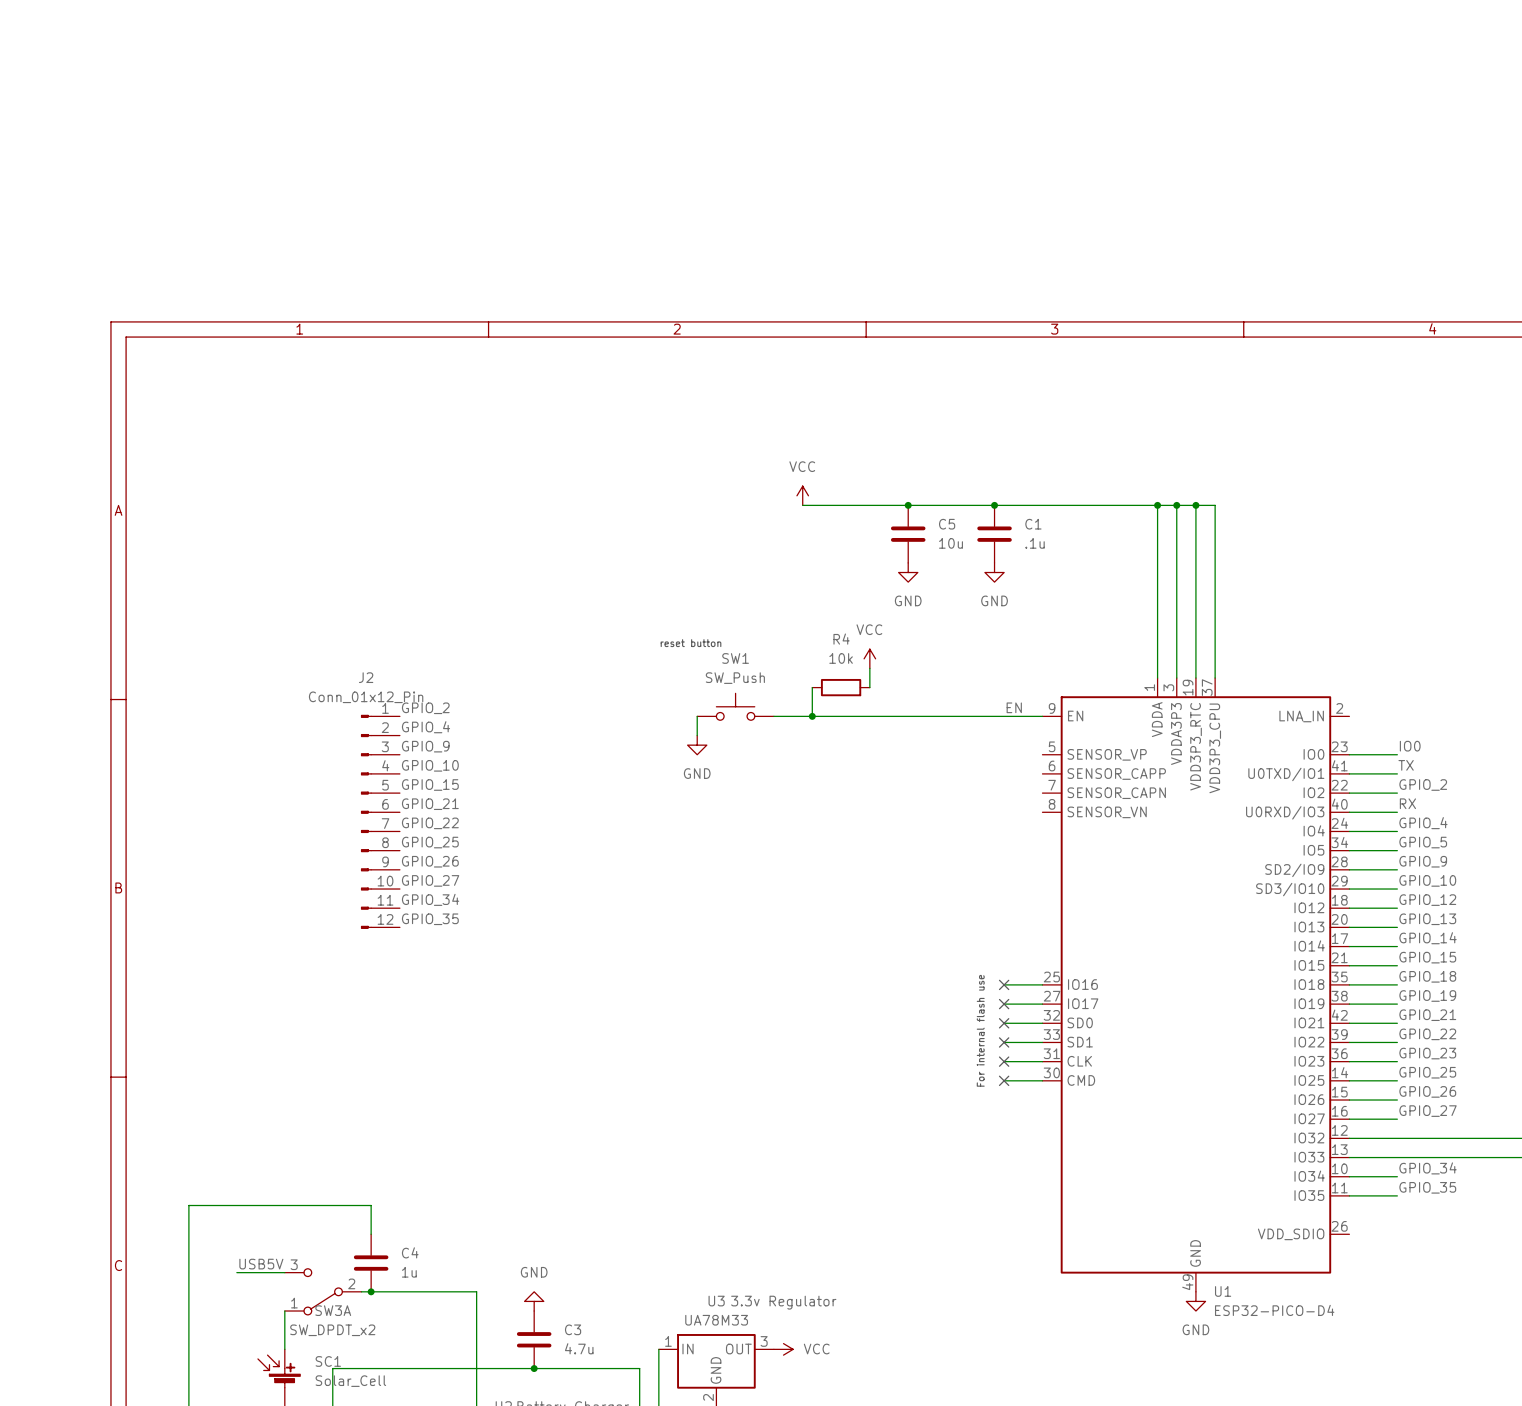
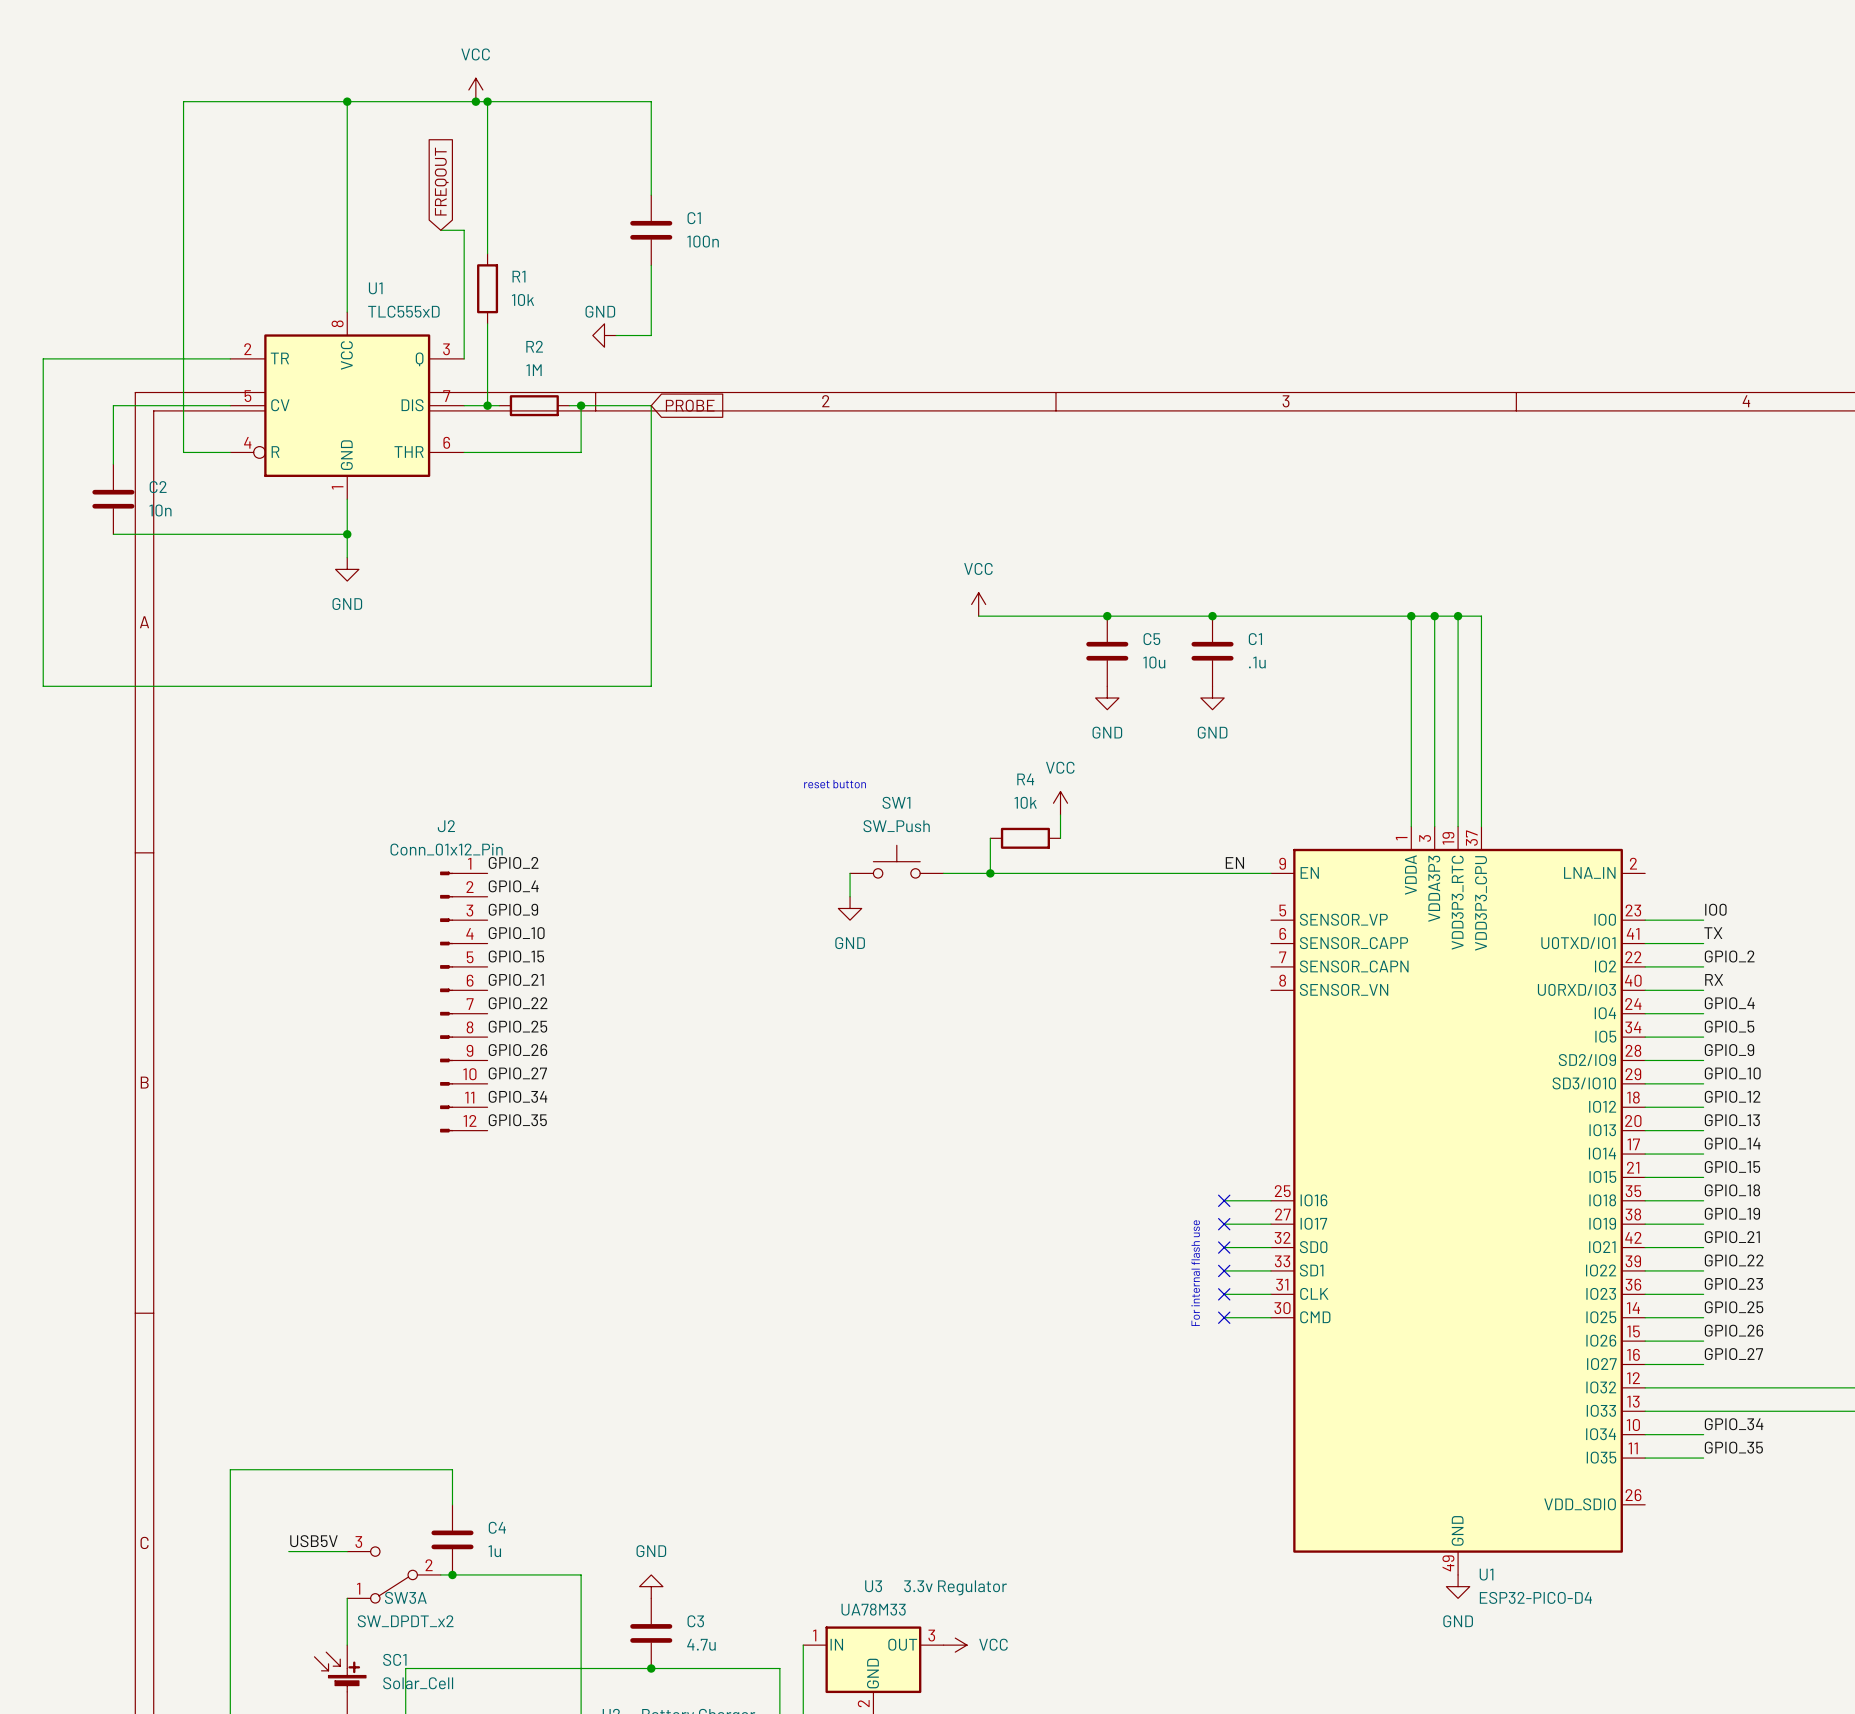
power symbol: none -> VCC (475, 89)
wire: none -> (347, 101) (347, 312)
junction: none -> (347, 101)
junction: none -> (475, 101)
wire: none -> (487, 101) (487, 253)
junction: none -> (487, 101)
global label: none -> FREQOUT (441, 181)
wire: none -> (651, 195) (651, 101) (183, 101) (183, 452) (230, 452)
wire: none -> (440, 230) (464, 230) (464, 358)
C1: none -> 100n (651, 230)
wire: none -> (651, 265) (651, 335) (616, 335)
R1: none -> 10k (487, 288)
wire: none -> (487, 323) (487, 405)
power symbol: none -> GND (604, 335)
wire: none -> (230, 358) (43, 358) (43, 686) (651, 686) (651, 405) (569, 405)
wire: none -> (230, 405) (113, 405) (113, 464)
U1: none -> TLC555xD (347, 405)
wire: none -> (464, 405) (499, 405)
junction: none -> (487, 405)
R2: none -> 1M (534, 405)
wire: none -> (581, 405) (581, 452) (464, 452)
junction: none -> (581, 405)
global label: none -> PROBE (690, 405)
C2: none -> 10n (113, 499)
wire: none -> (347, 499) (347, 557)
wire: none -> (113, 534) (347, 534)
junction: none -> (347, 534)
power symbol: none -> GND (347, 569)

